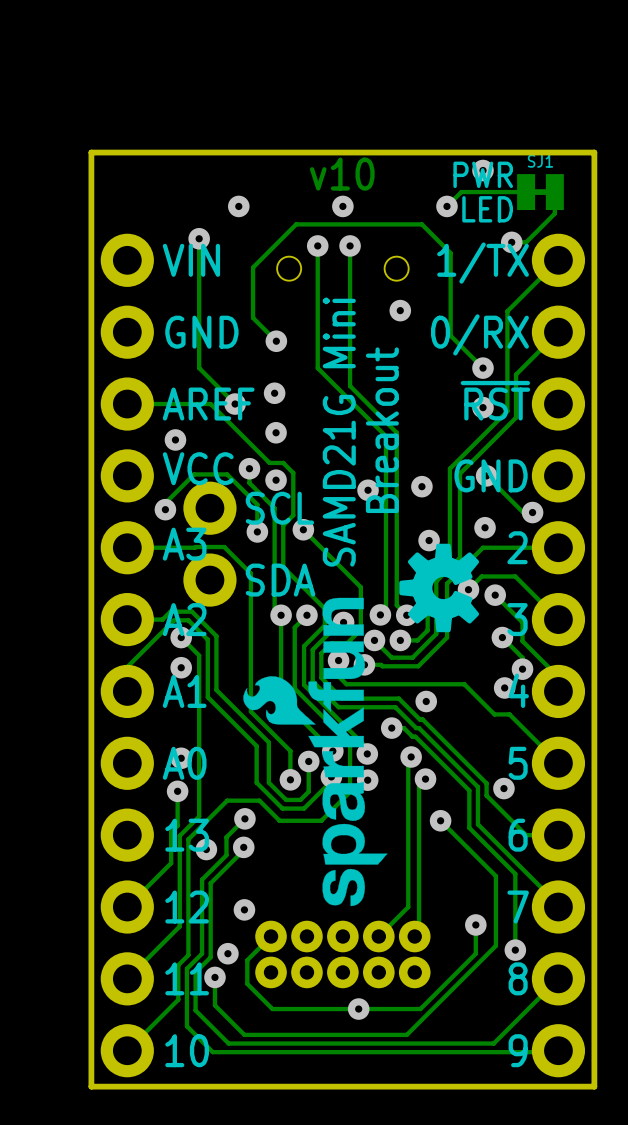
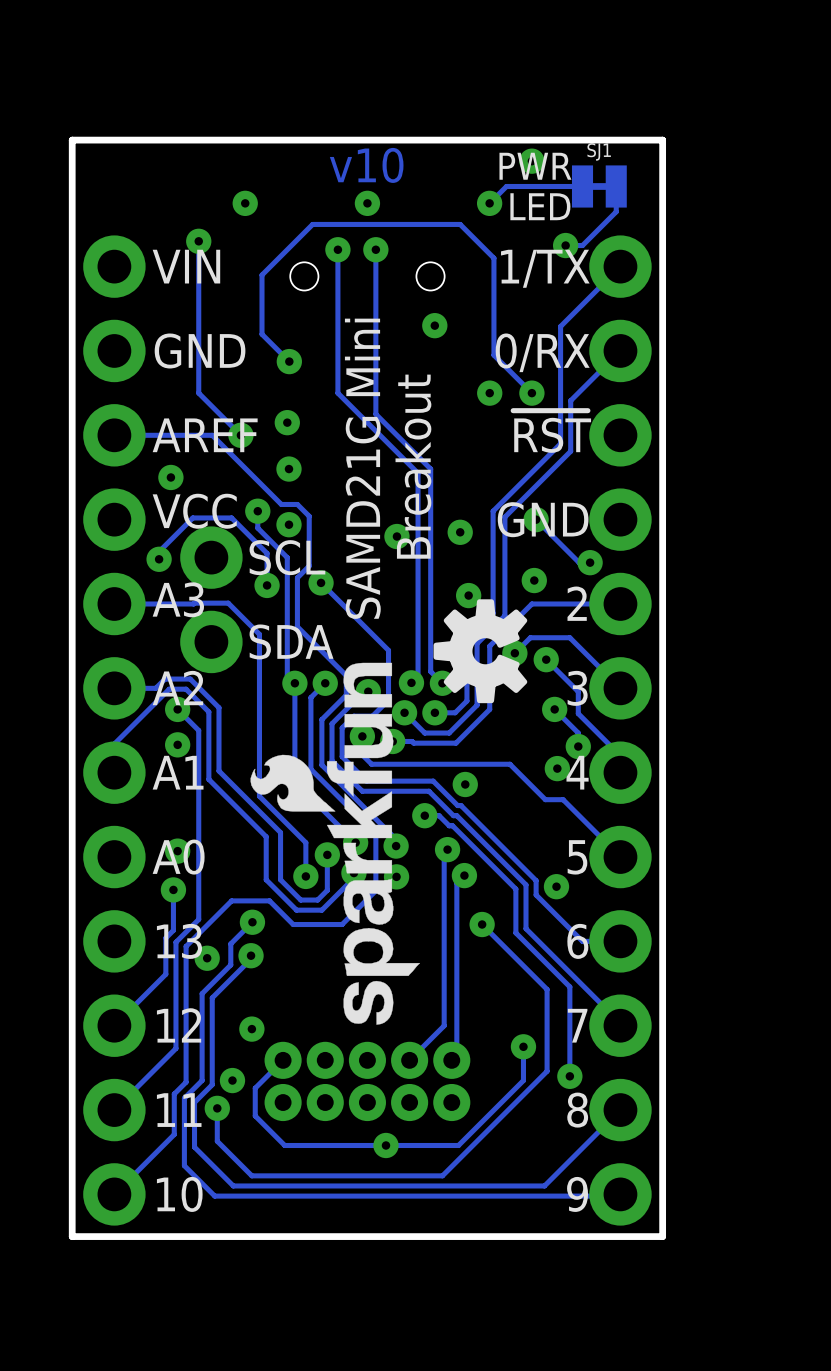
via position: (483, 407) -> (489, 393)

